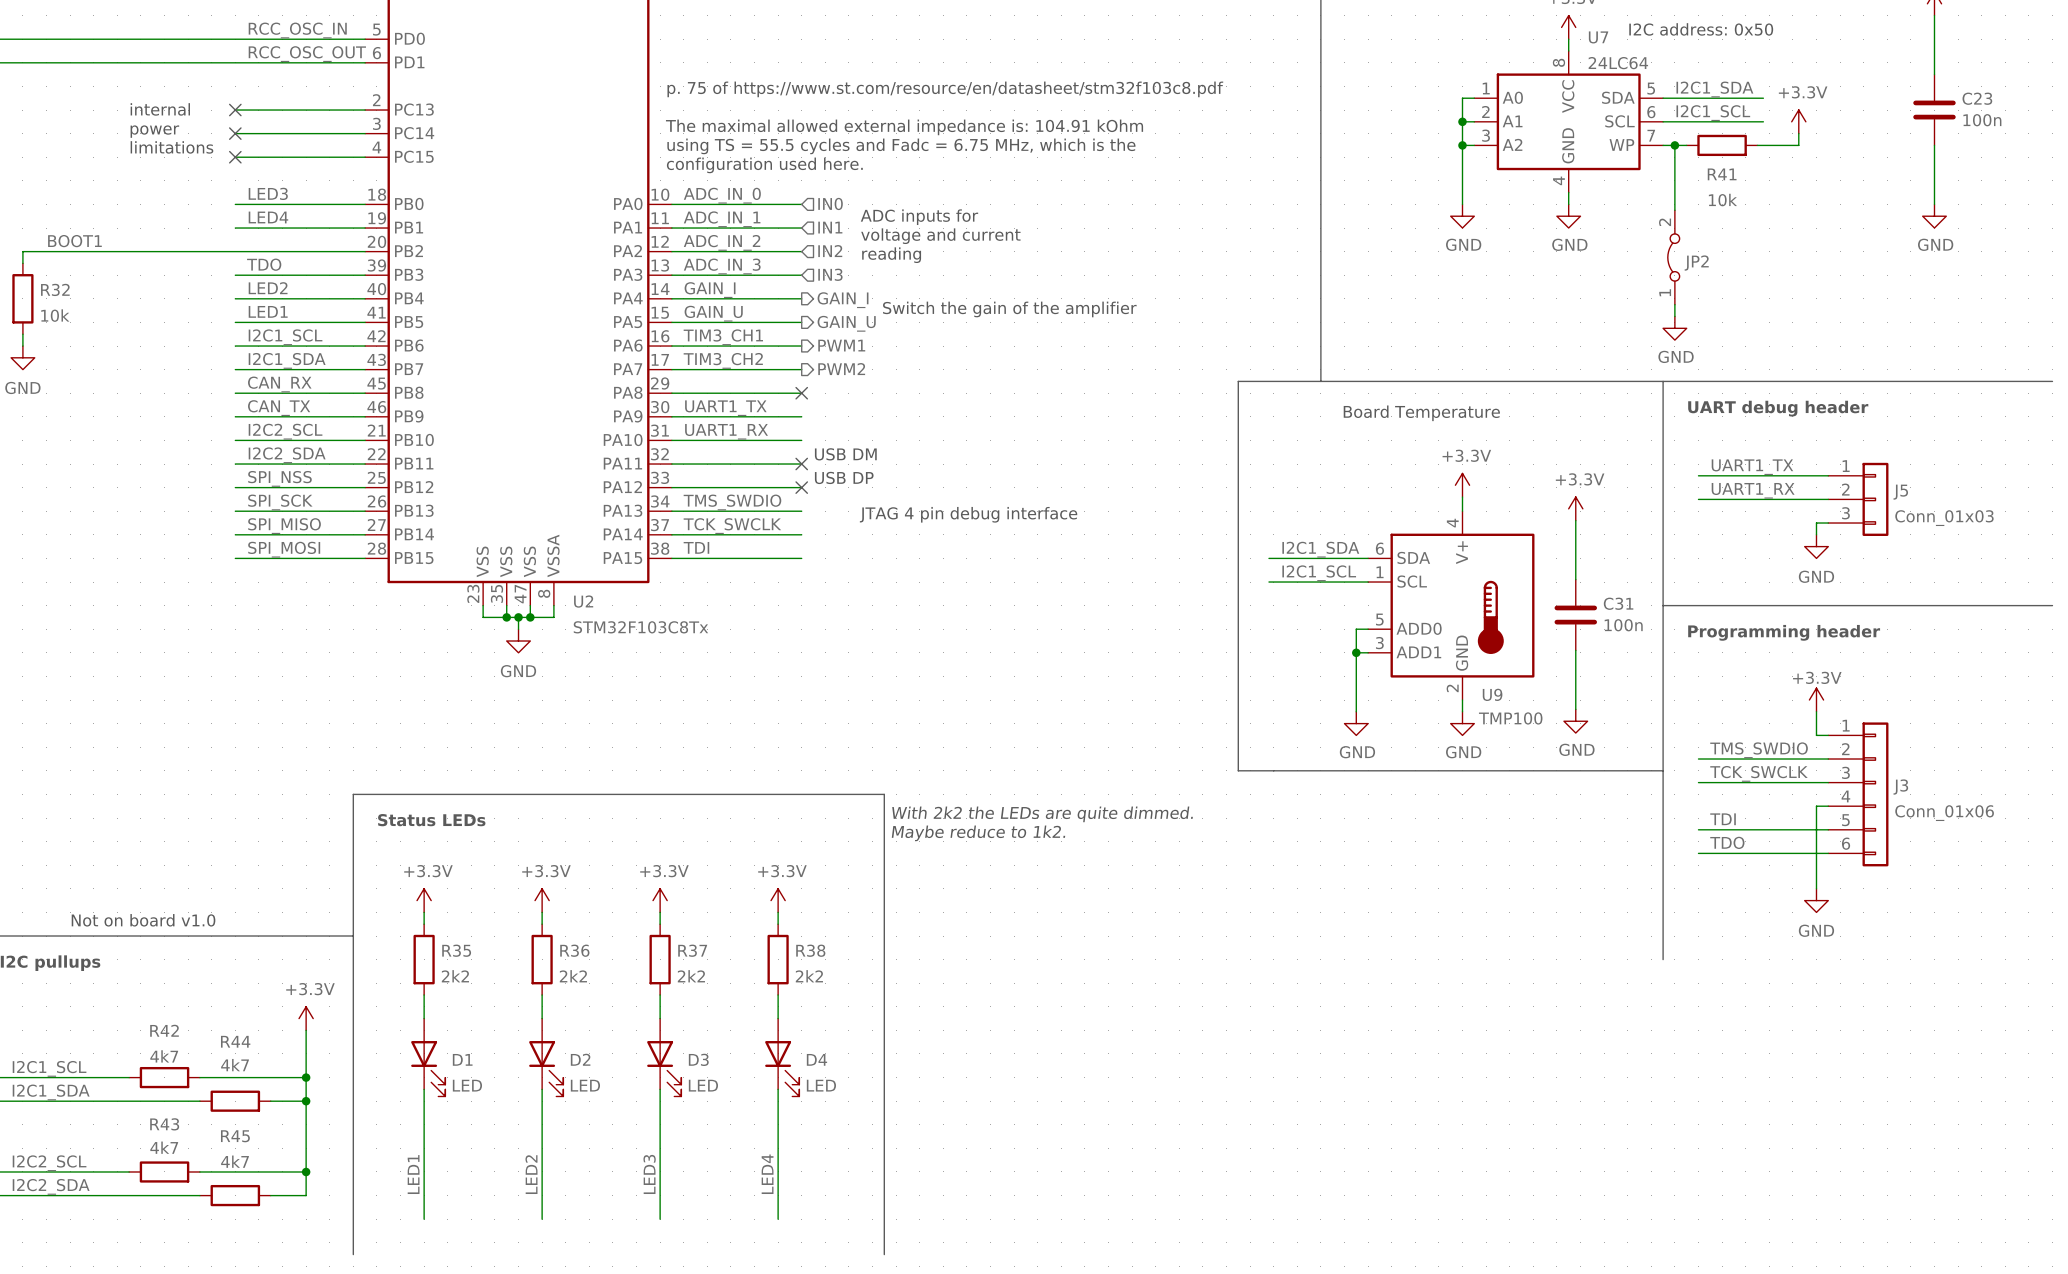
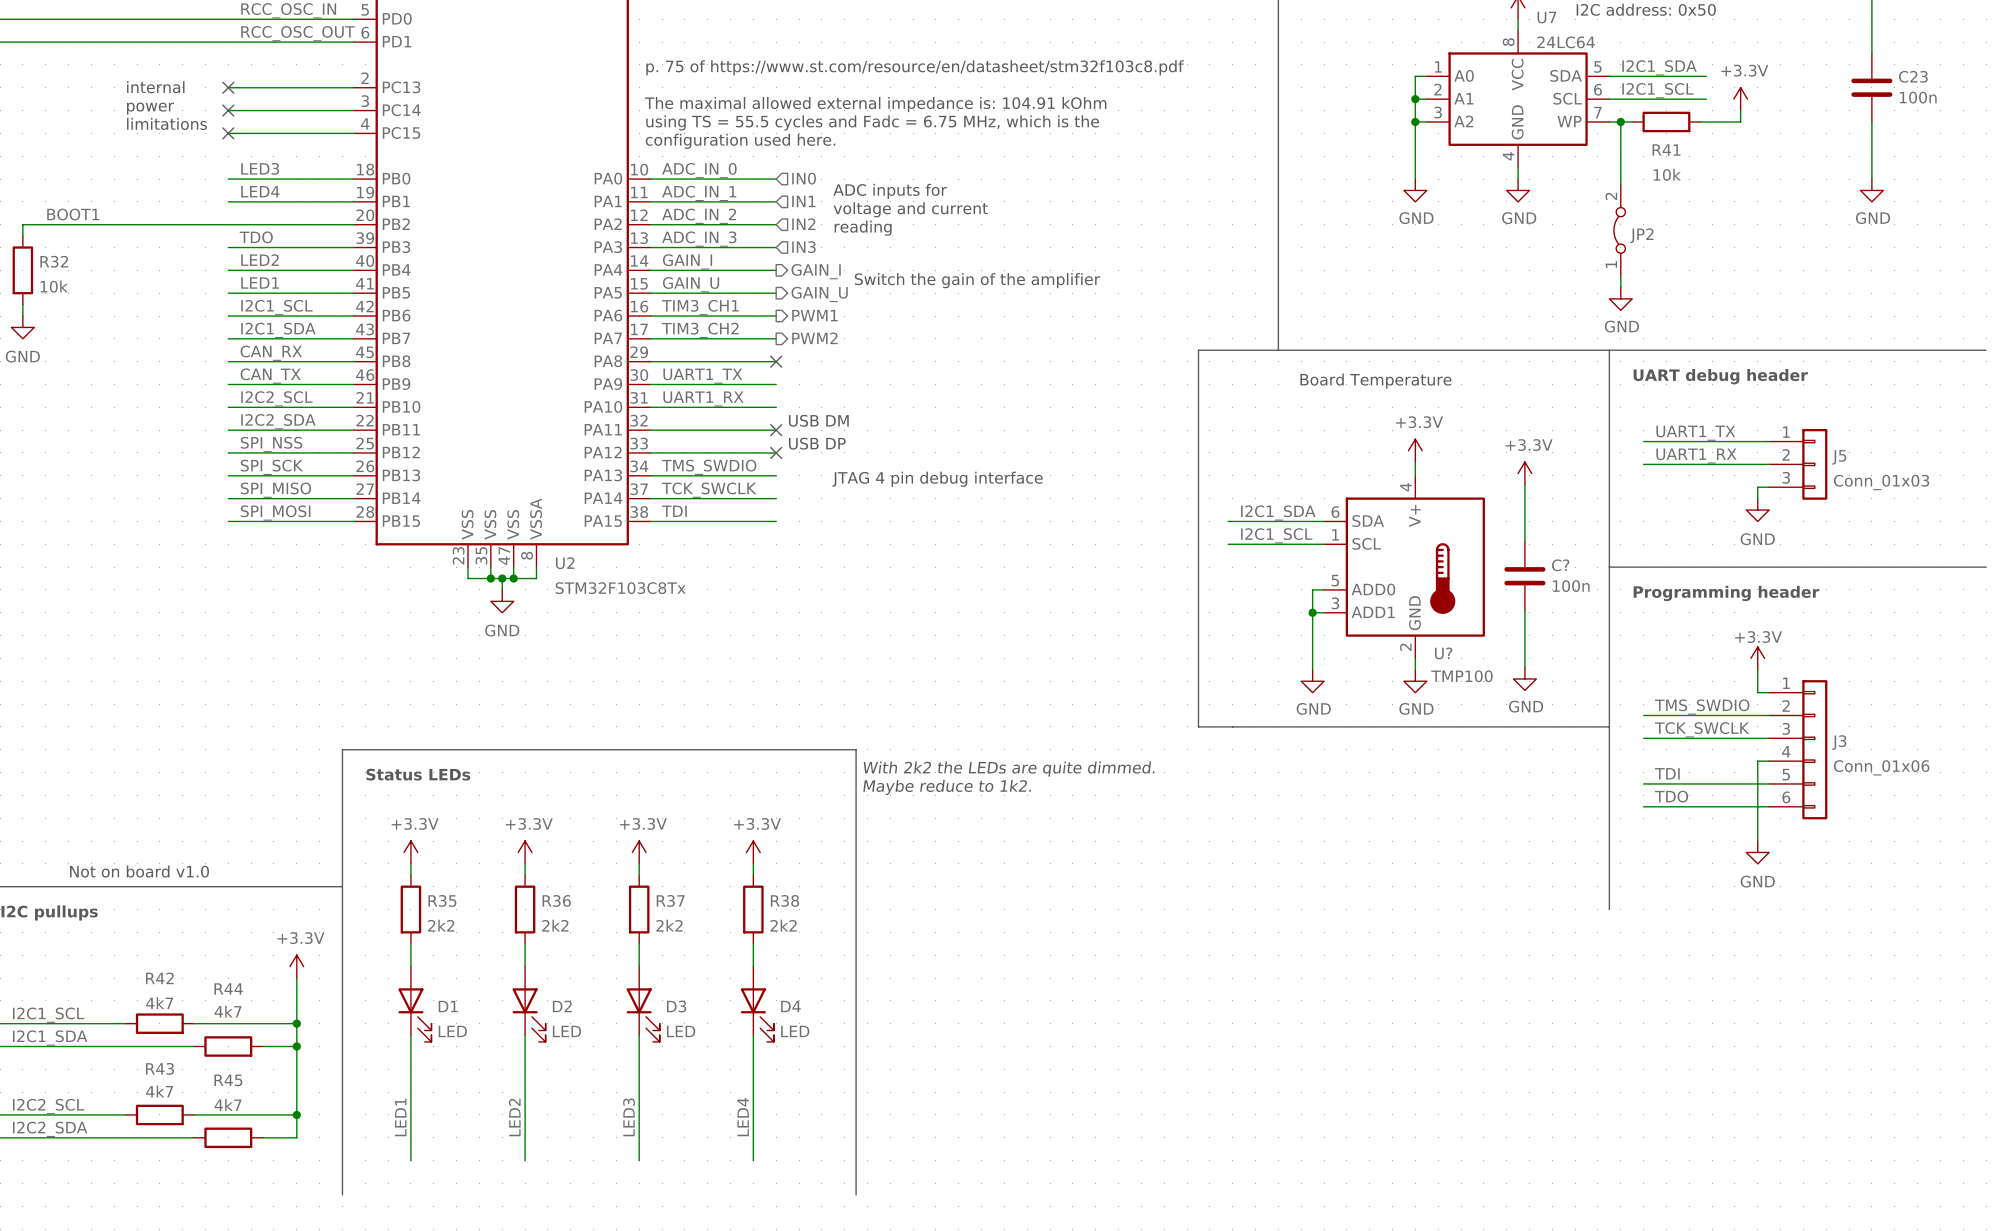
C31 name: C31 (1618, 603) -> C? (1560, 565)
U9 name: U9 (1492, 694) -> U? (1443, 653)

